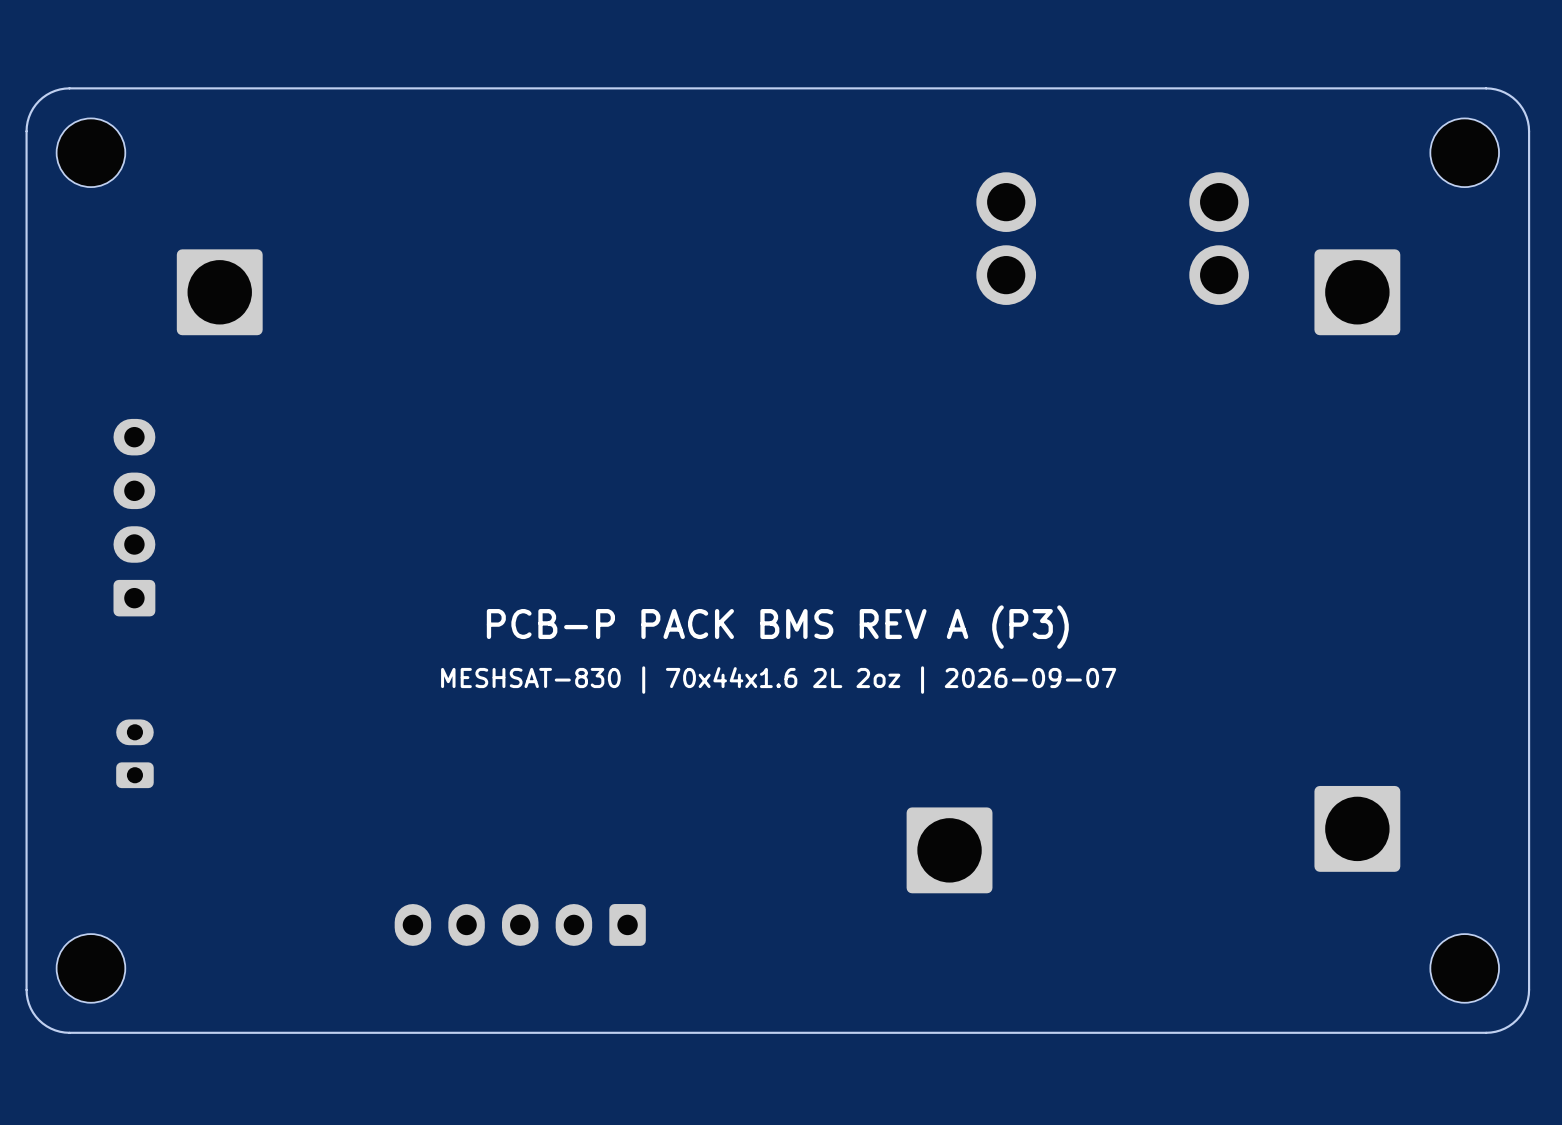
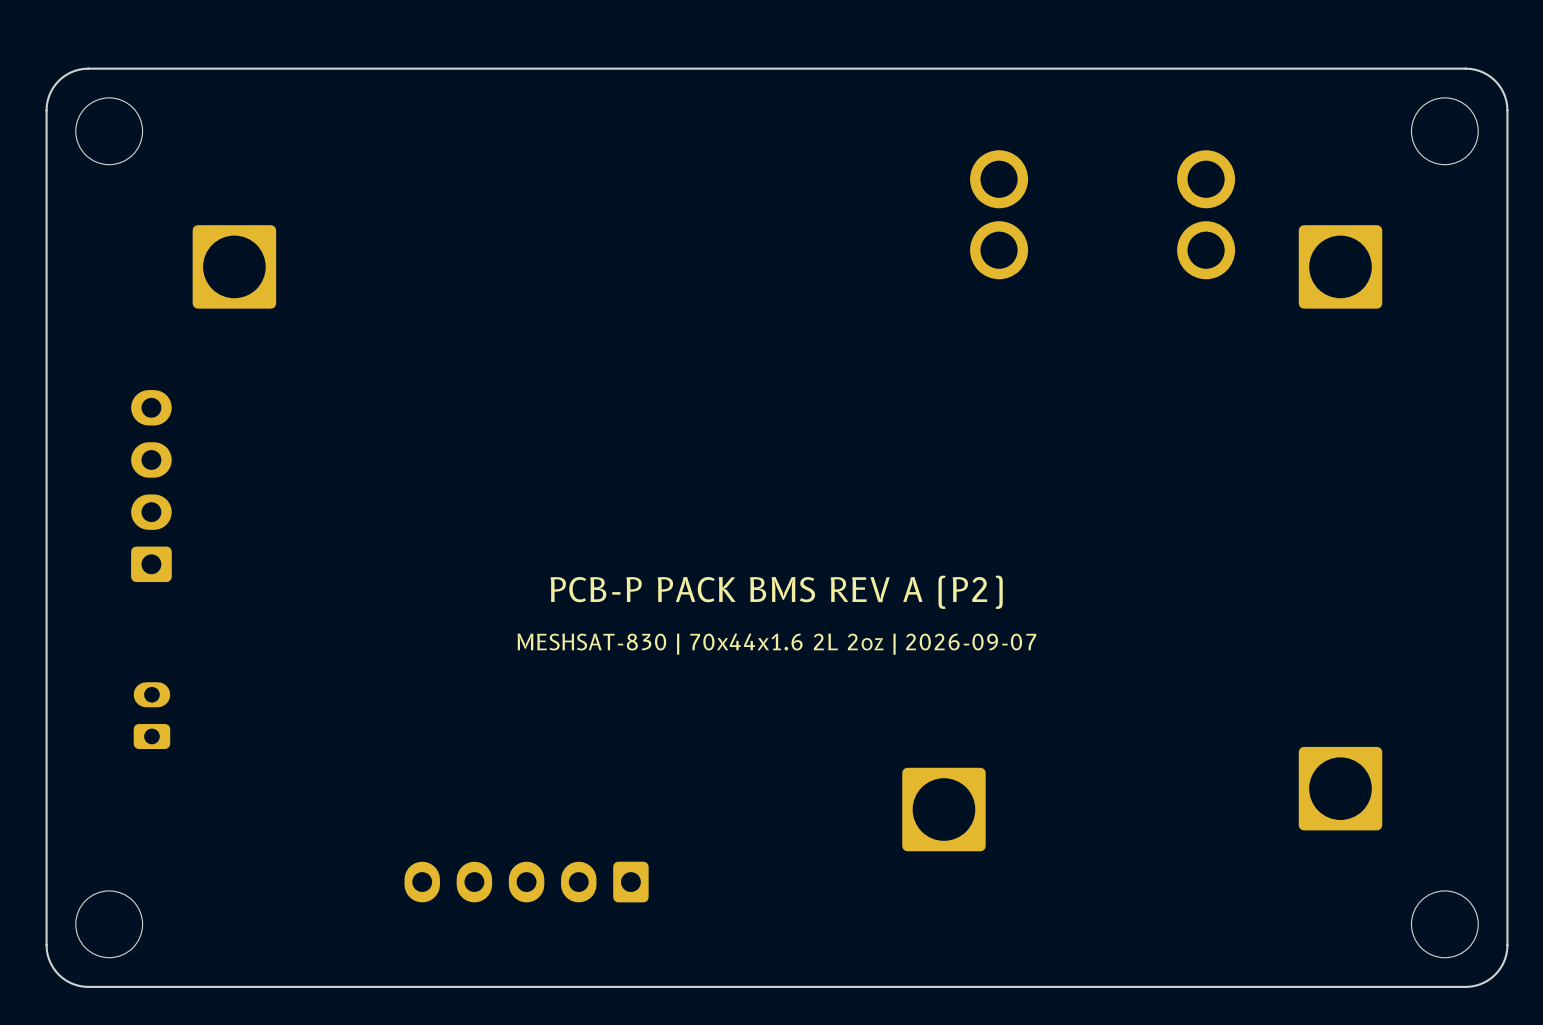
text: PCB-P PACK BMS REV A (P3) (777, 627) -> PCB-P PACK BMS REV A (P2) (776, 592)

